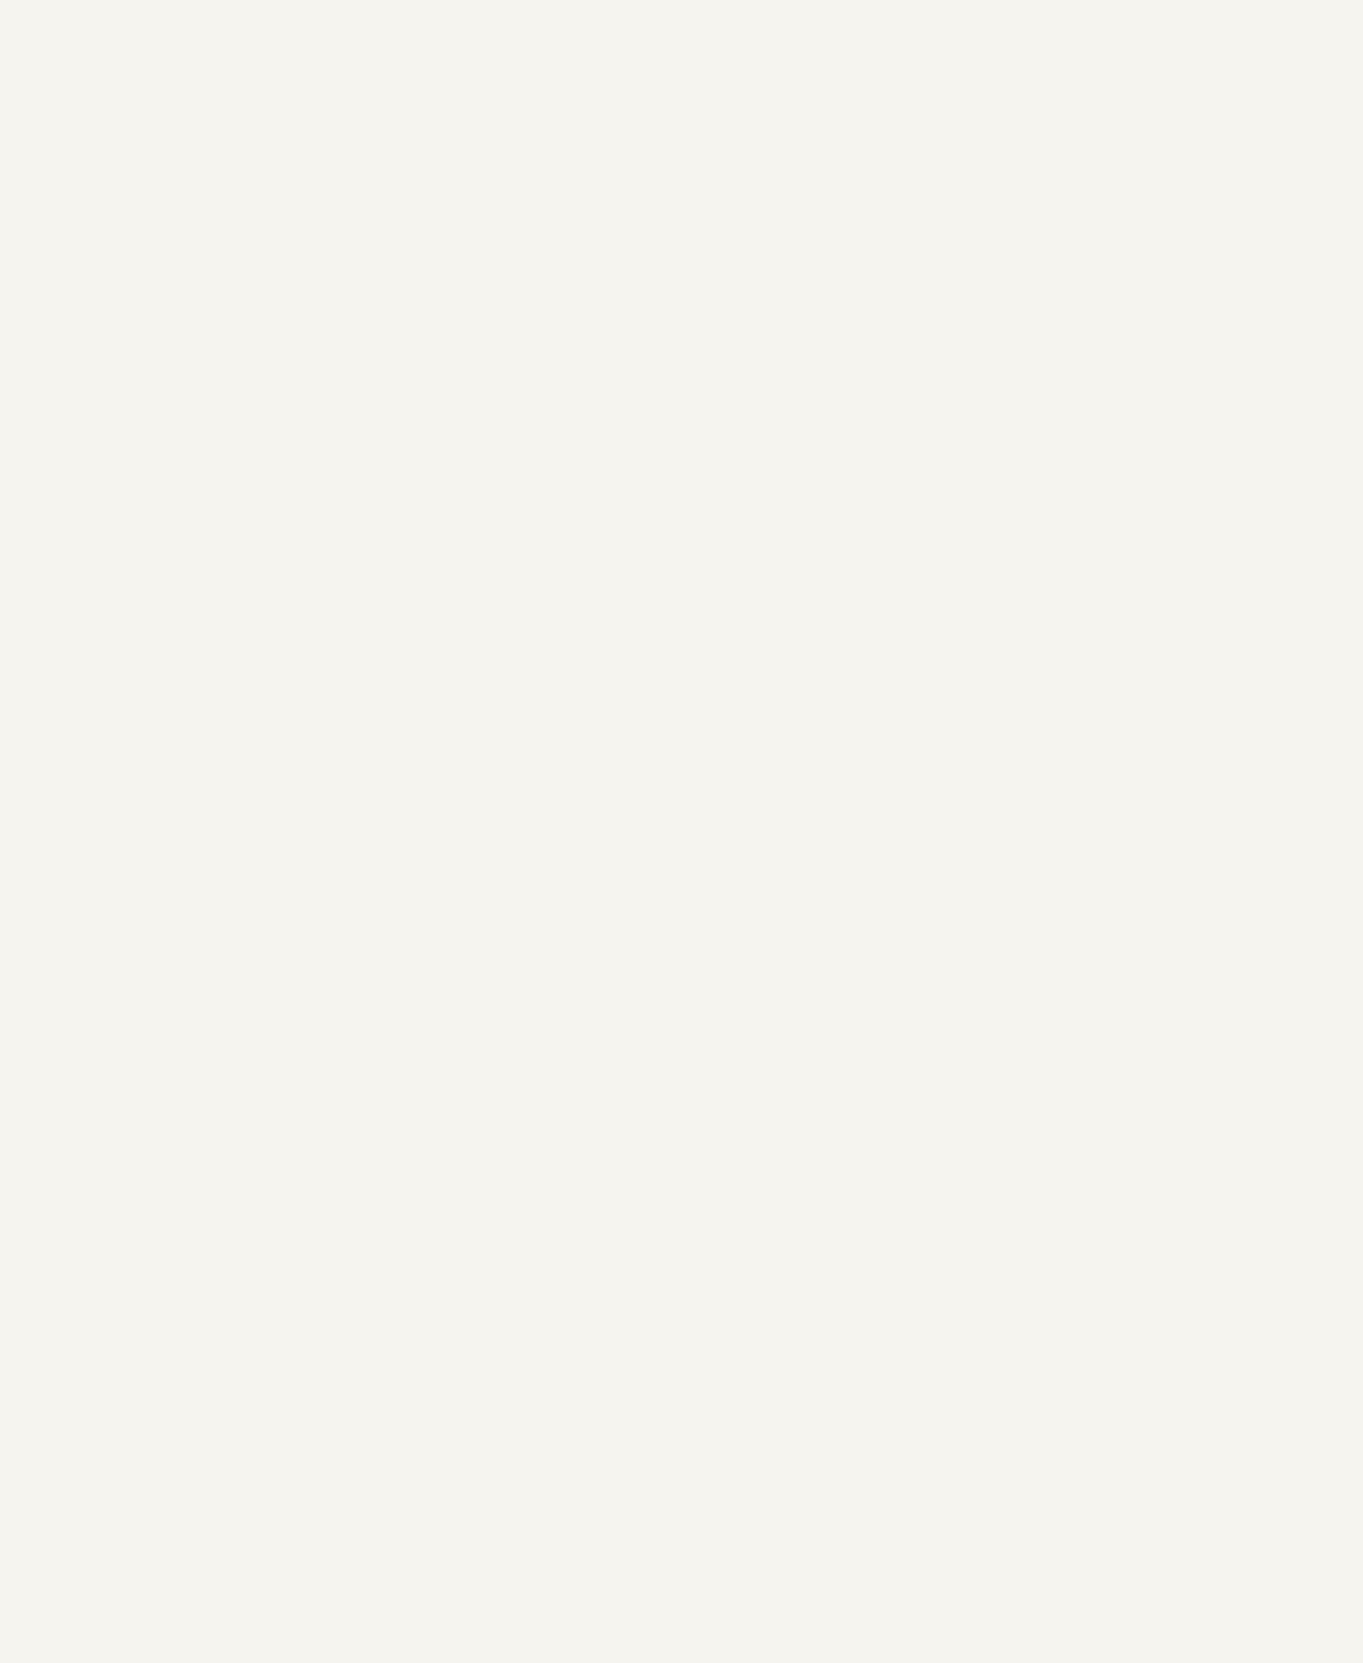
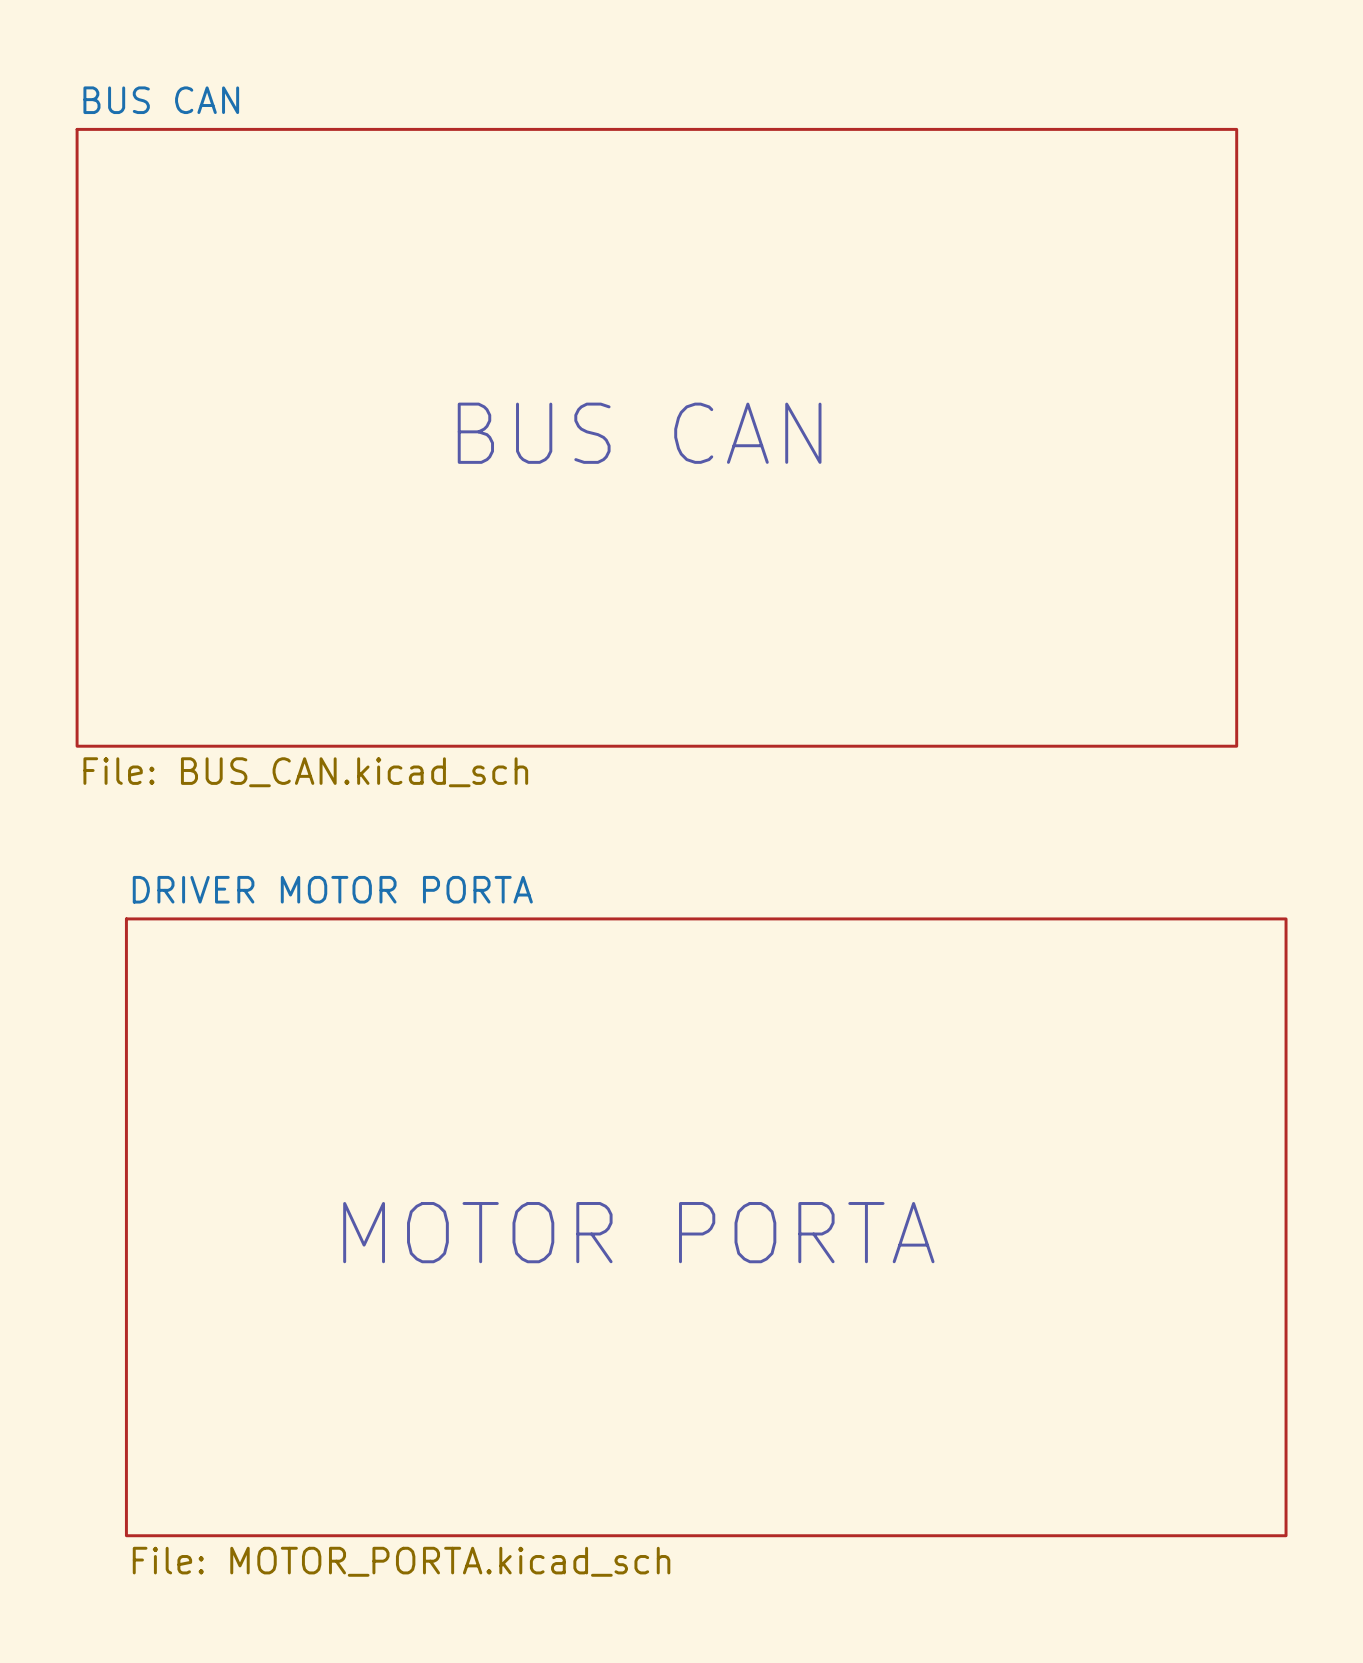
text: none -> BUS CAN (639, 433)
sheet BUS CAN: none -> File: BUS_CAN.kicad_sch (656, 437)
sheet DRIVER MOTOR PORTA: none -> File: MOTOR_PORTA.kicad_sch (706, 1227)
text: none -> MOTOR PORTA (638, 1232)

